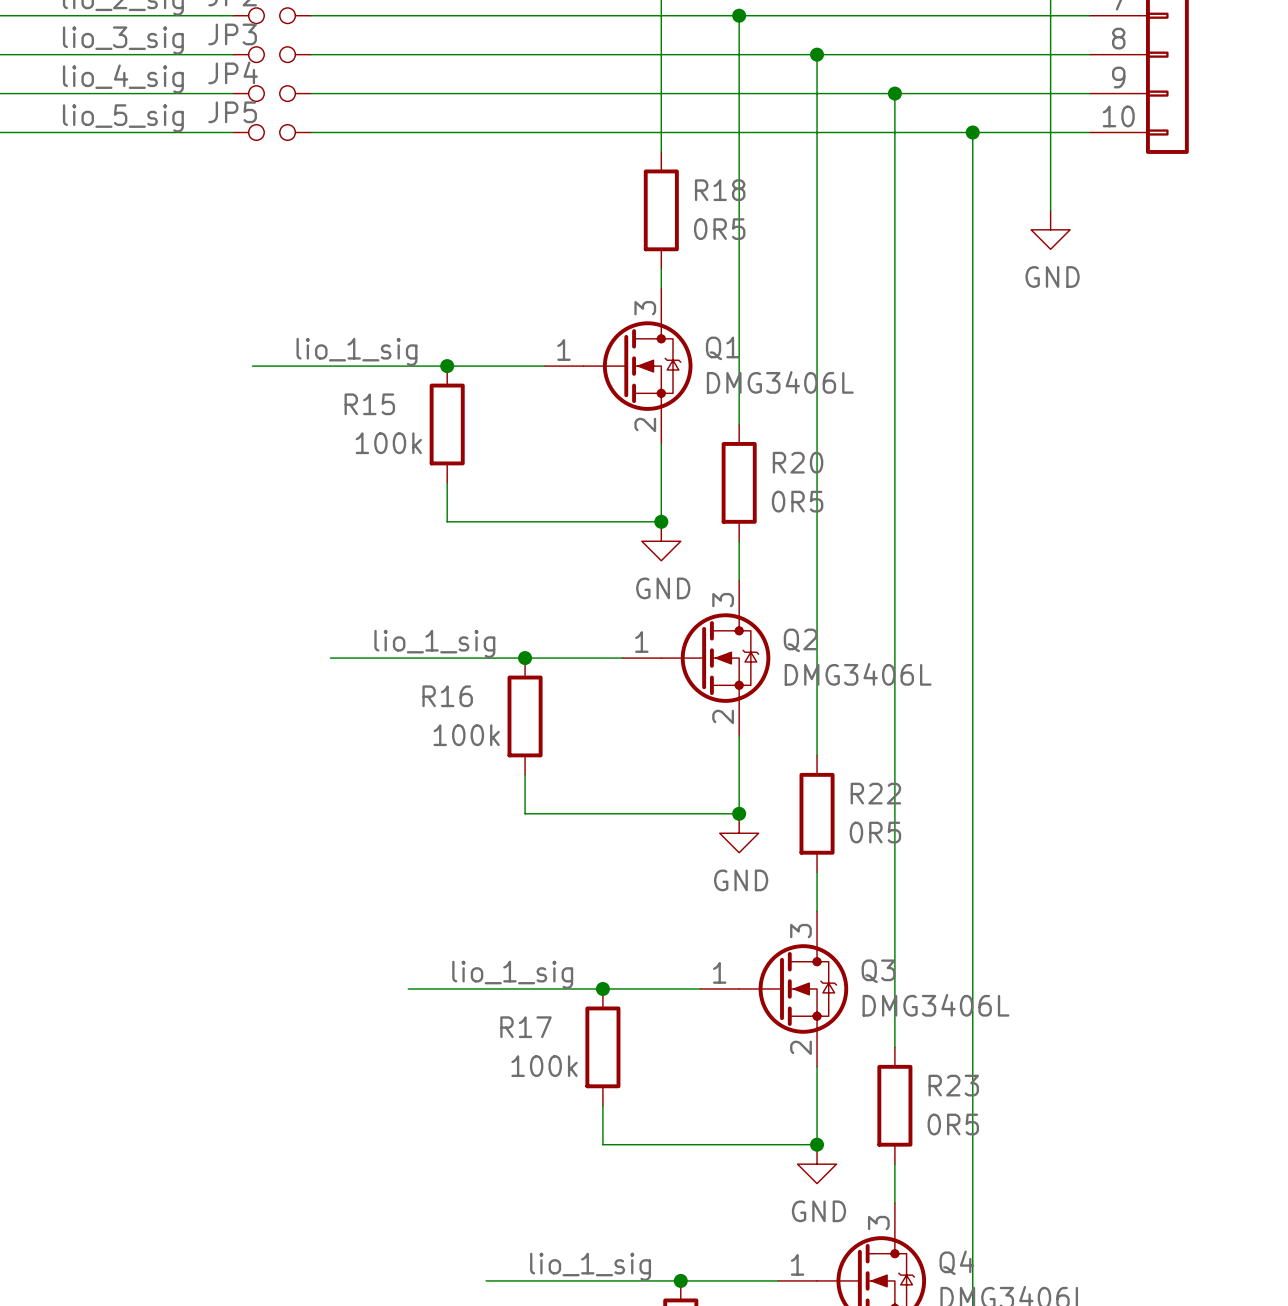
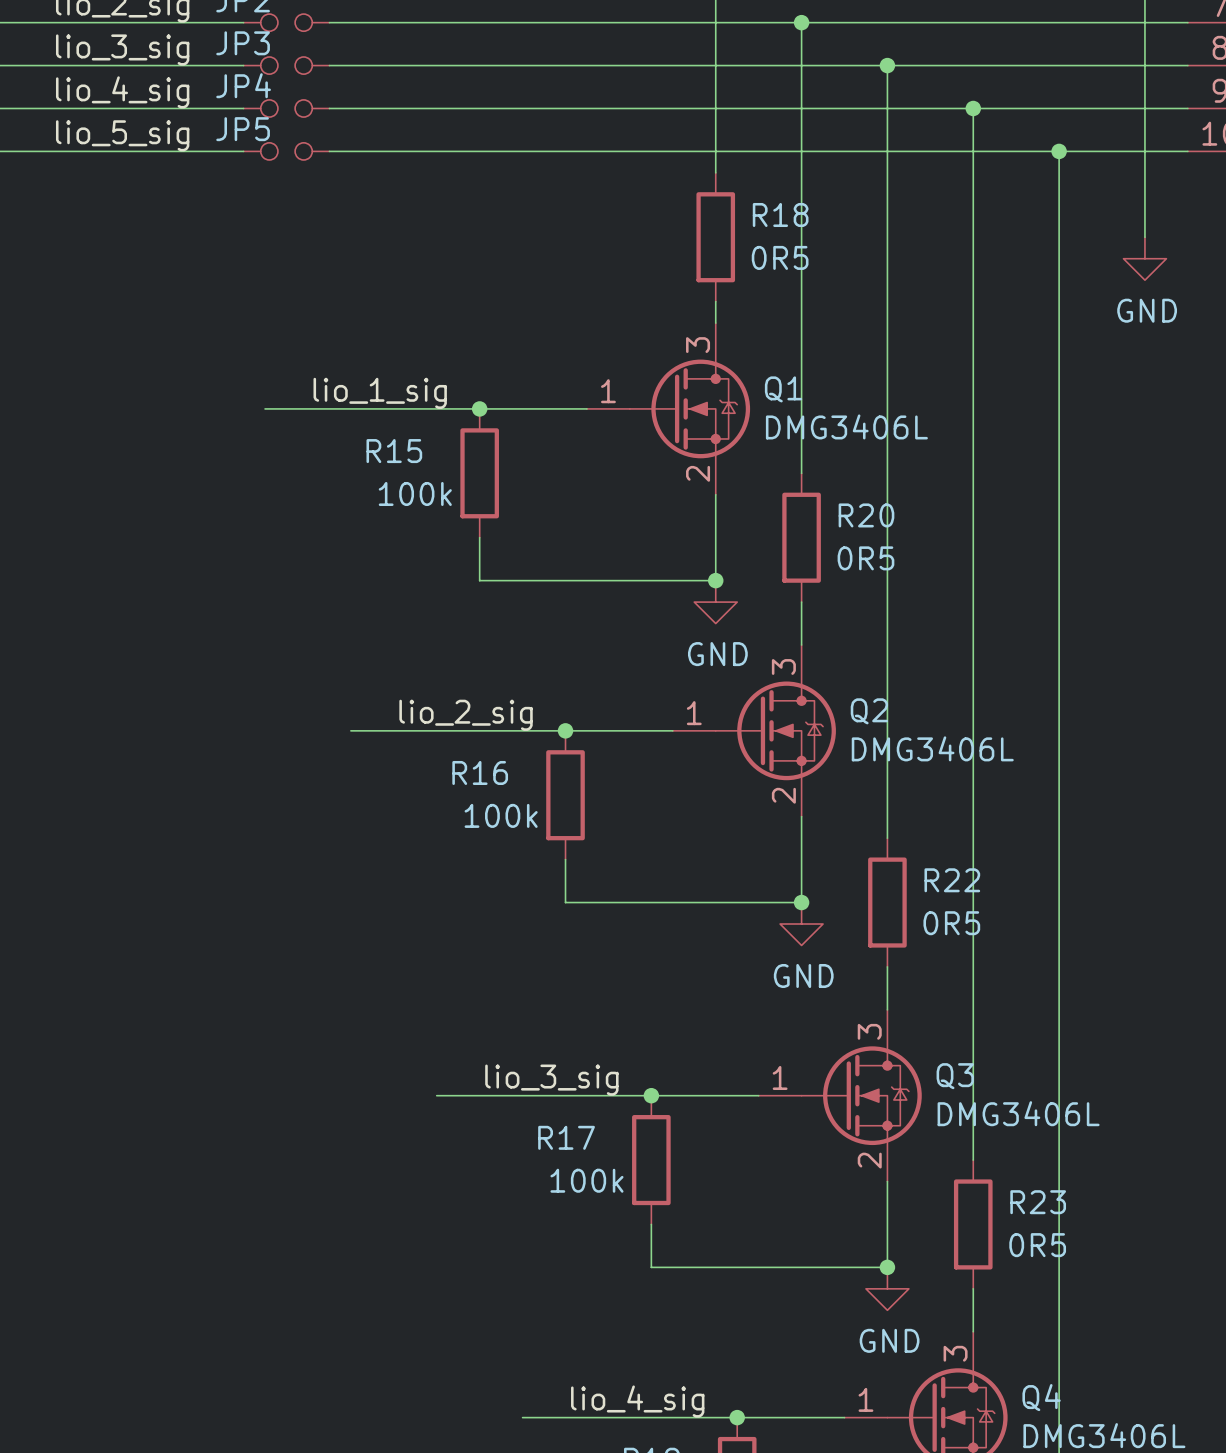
label: lio_1_sig (434, 643) -> lio_2_sig (466, 715)
label: lio_1_sig (512, 974) -> lio_3_sig (551, 1080)
label: lio_1_sig (590, 1266) -> lio_4_sig (637, 1401)

